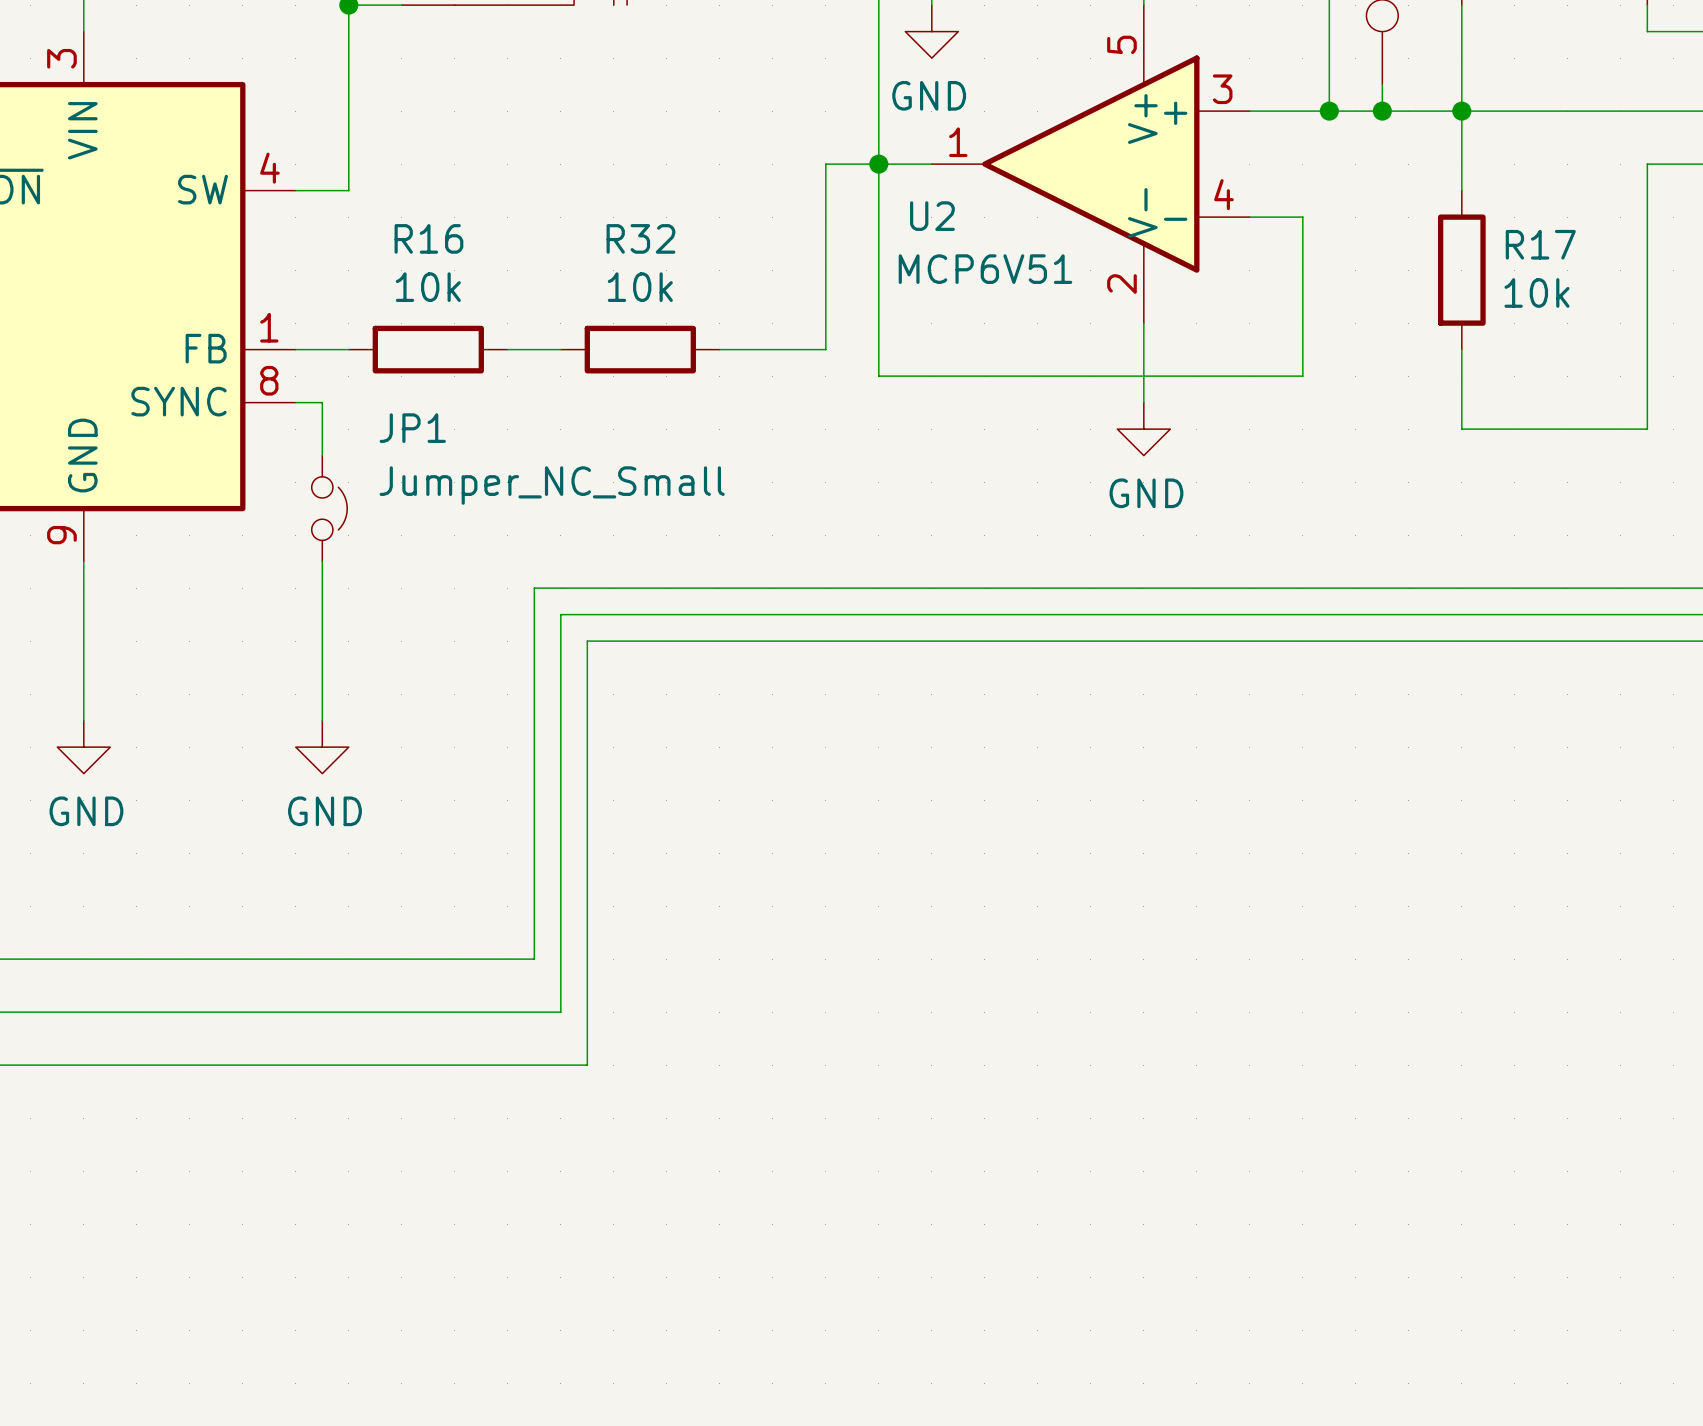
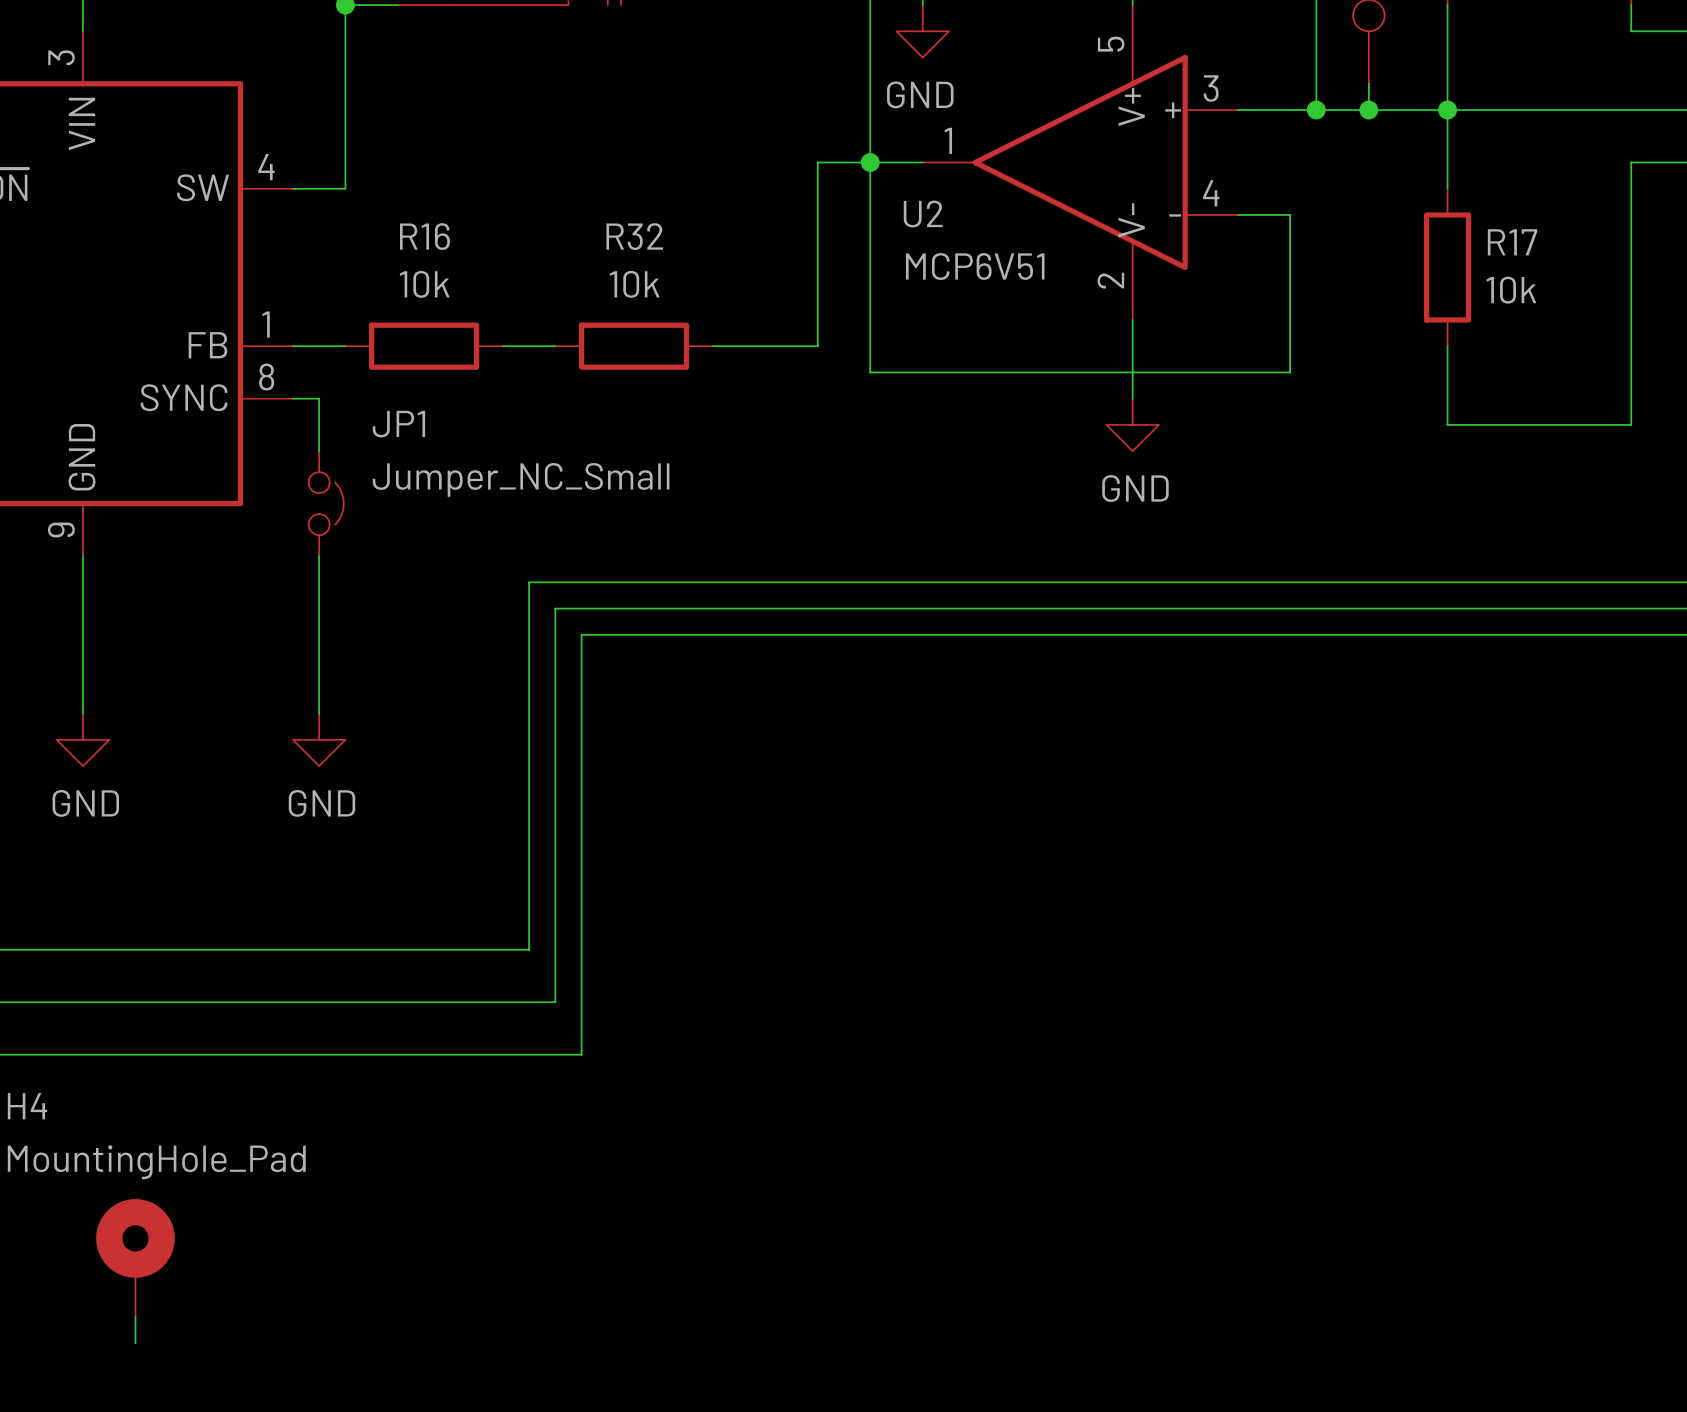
H4: none -> MountingHole_Pad (135, 1258)
wire: none -> (135, 1317) (135, 1343)

